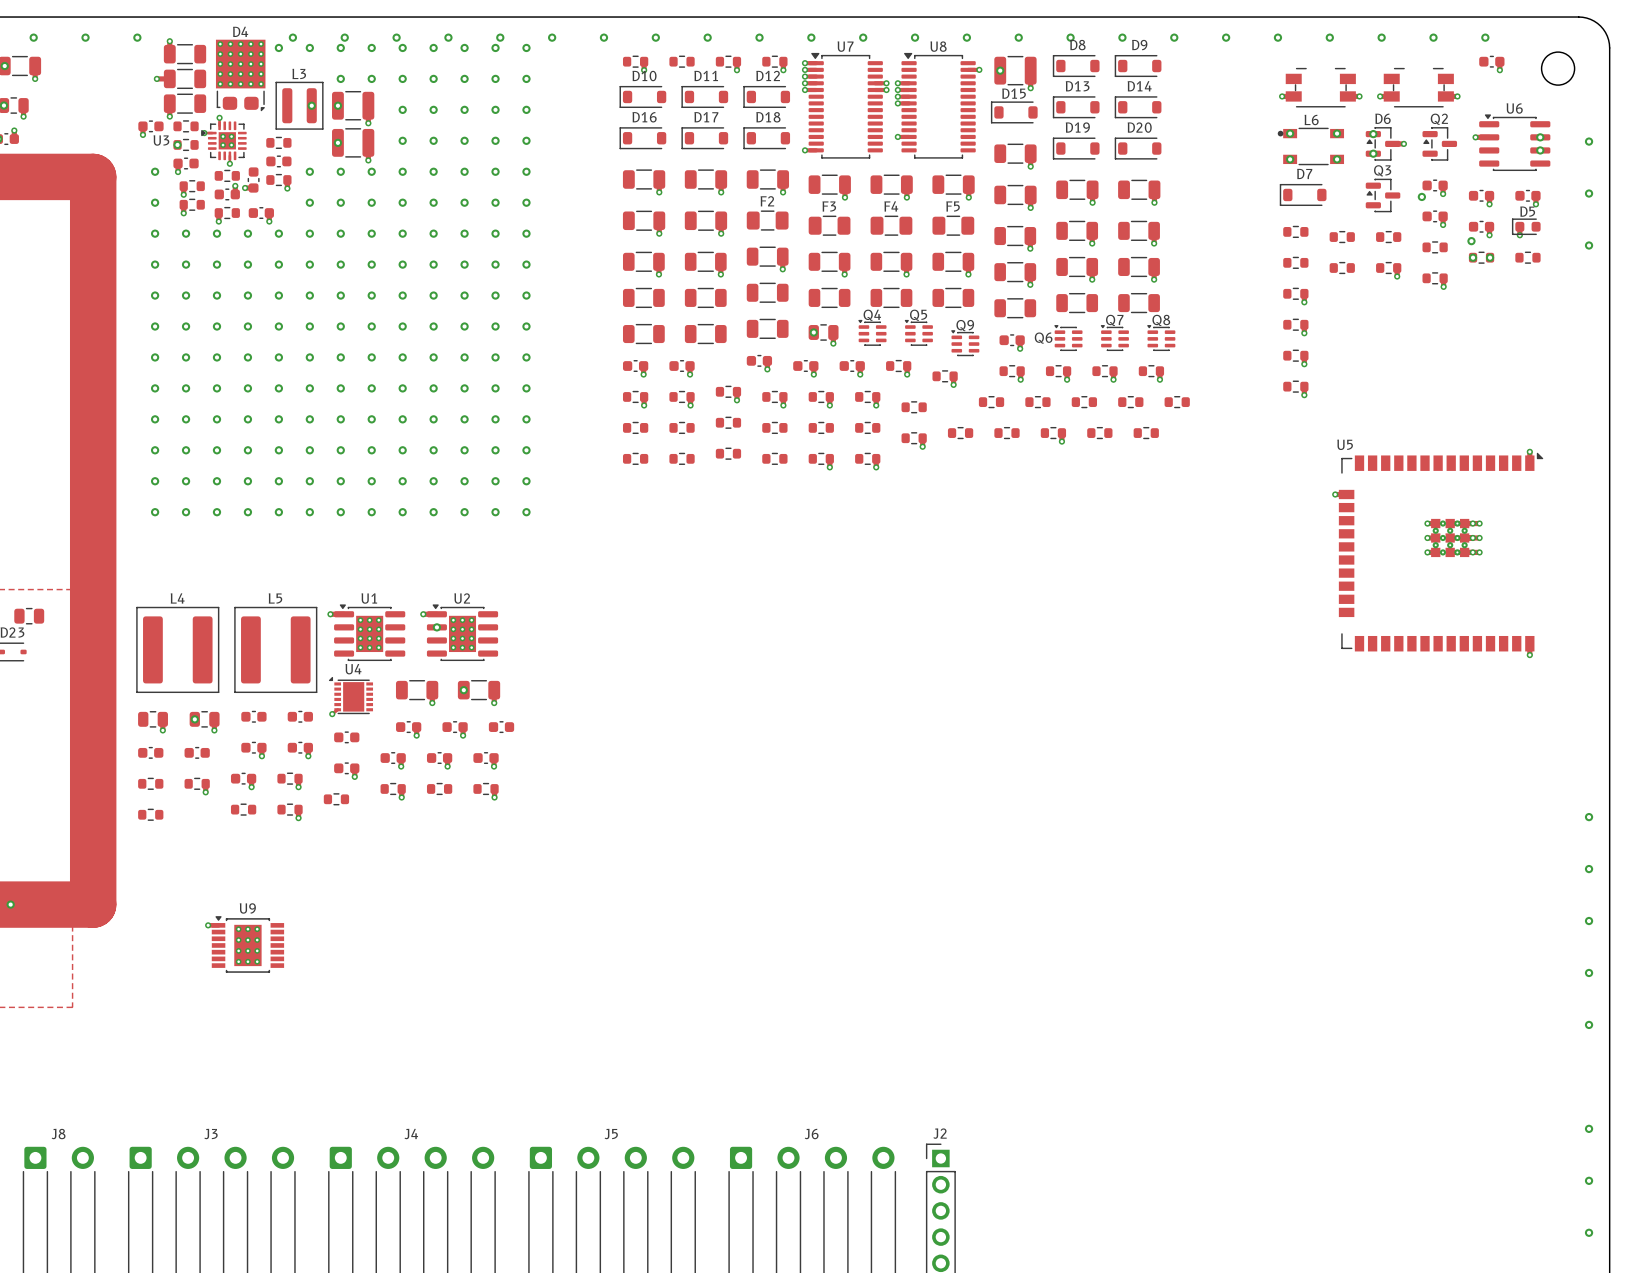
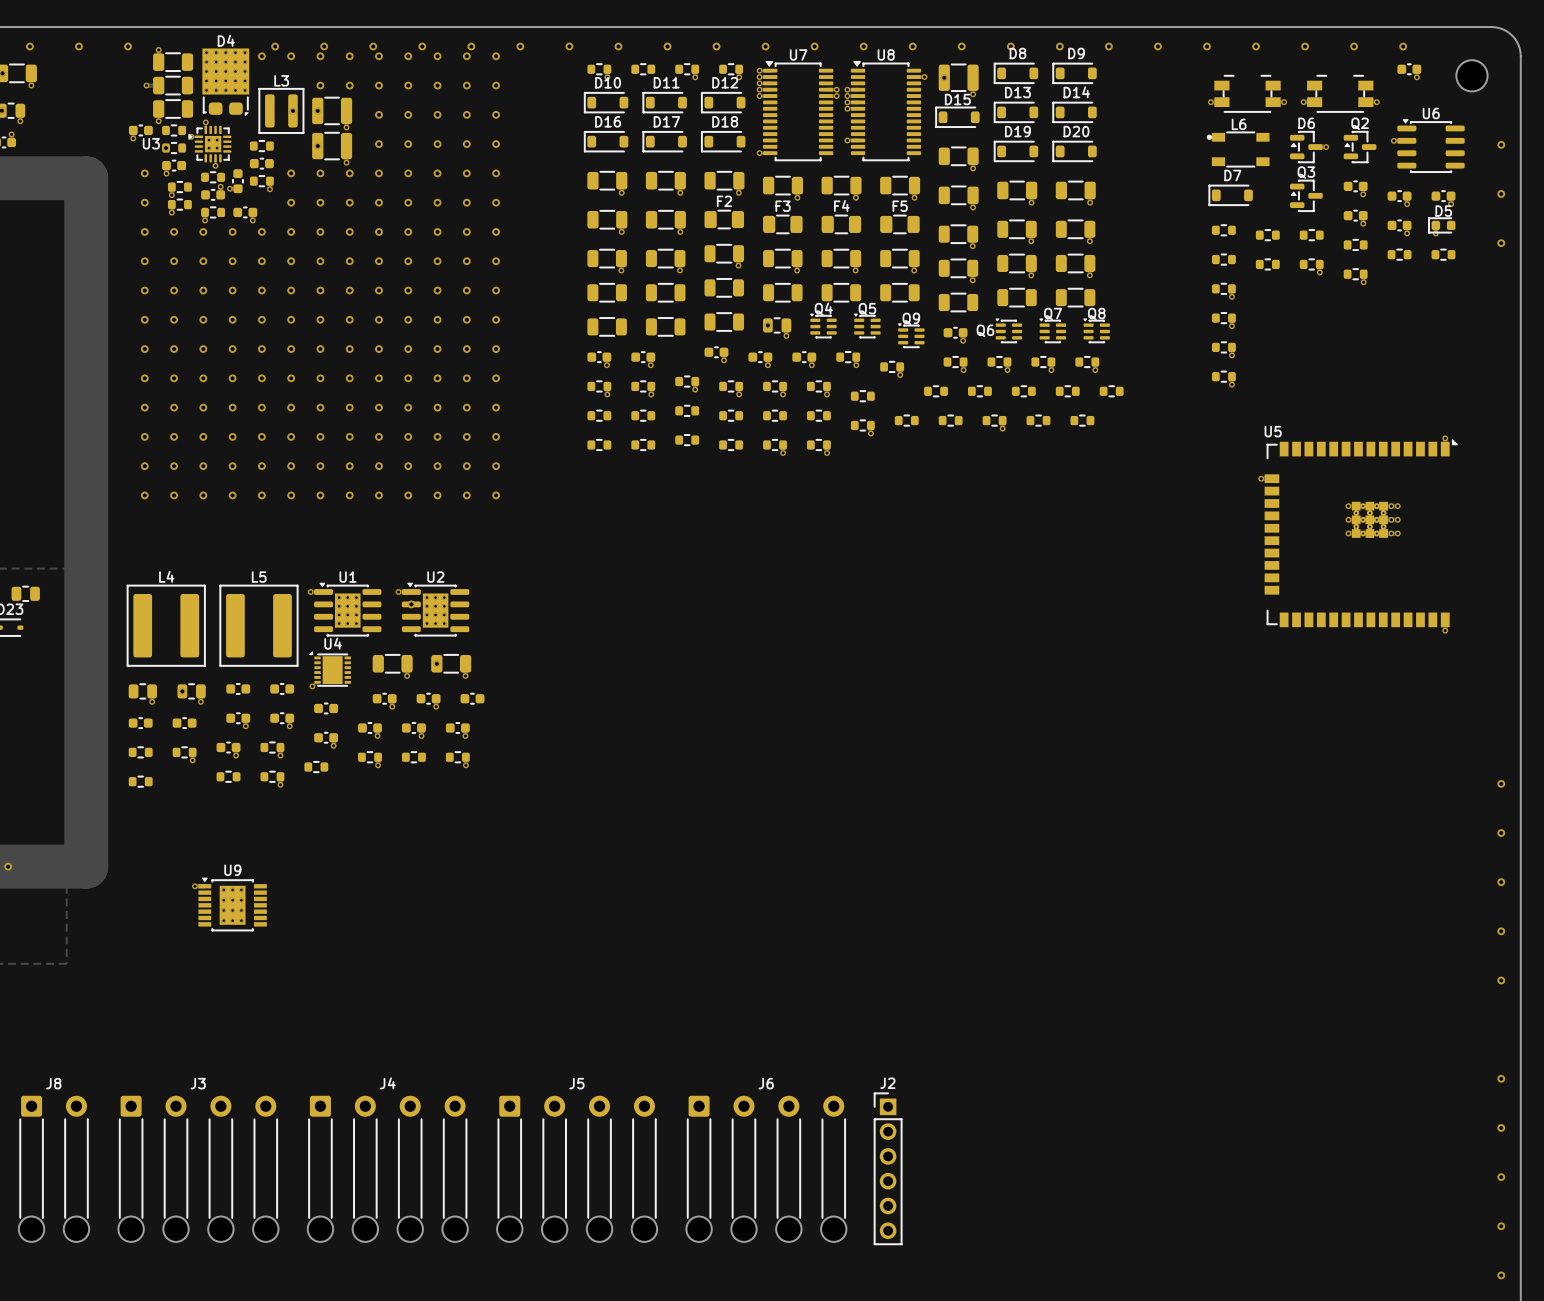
via: (1290, 133) -> none
via: (1337, 133) -> none
via: (1373, 134) -> none
via: (1540, 137) -> none
via: (1540, 150) -> none
via: (1373, 153) -> none
via: (1290, 159) -> none
via: (1337, 159) -> none
via: (1421, 196) -> none
via: (1471, 241) -> none
via: (1473, 257) -> none
via: (1490, 257) -> none

